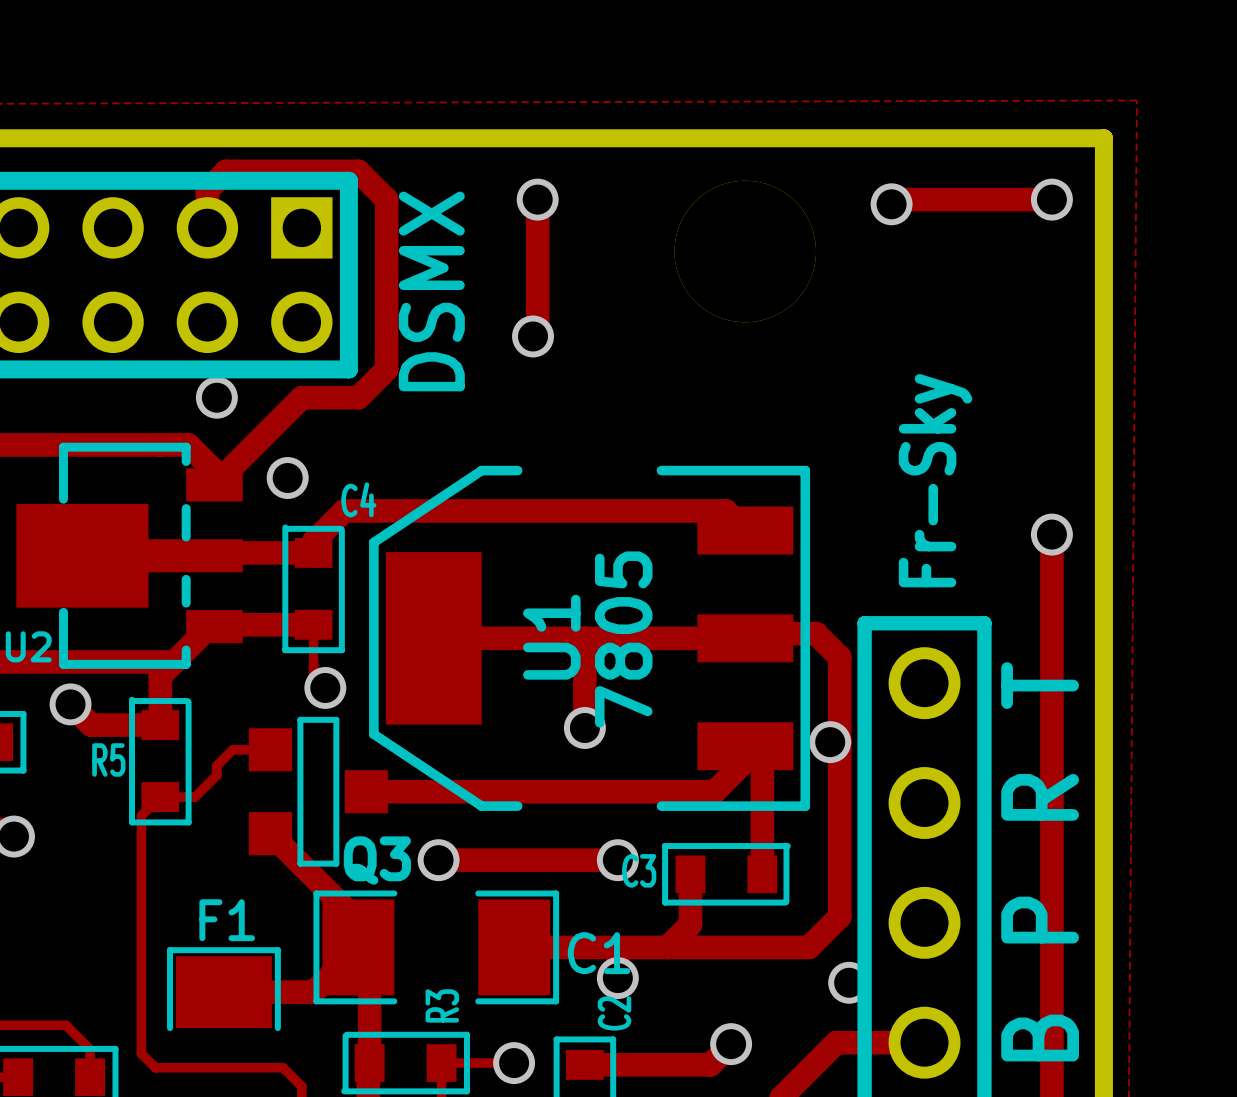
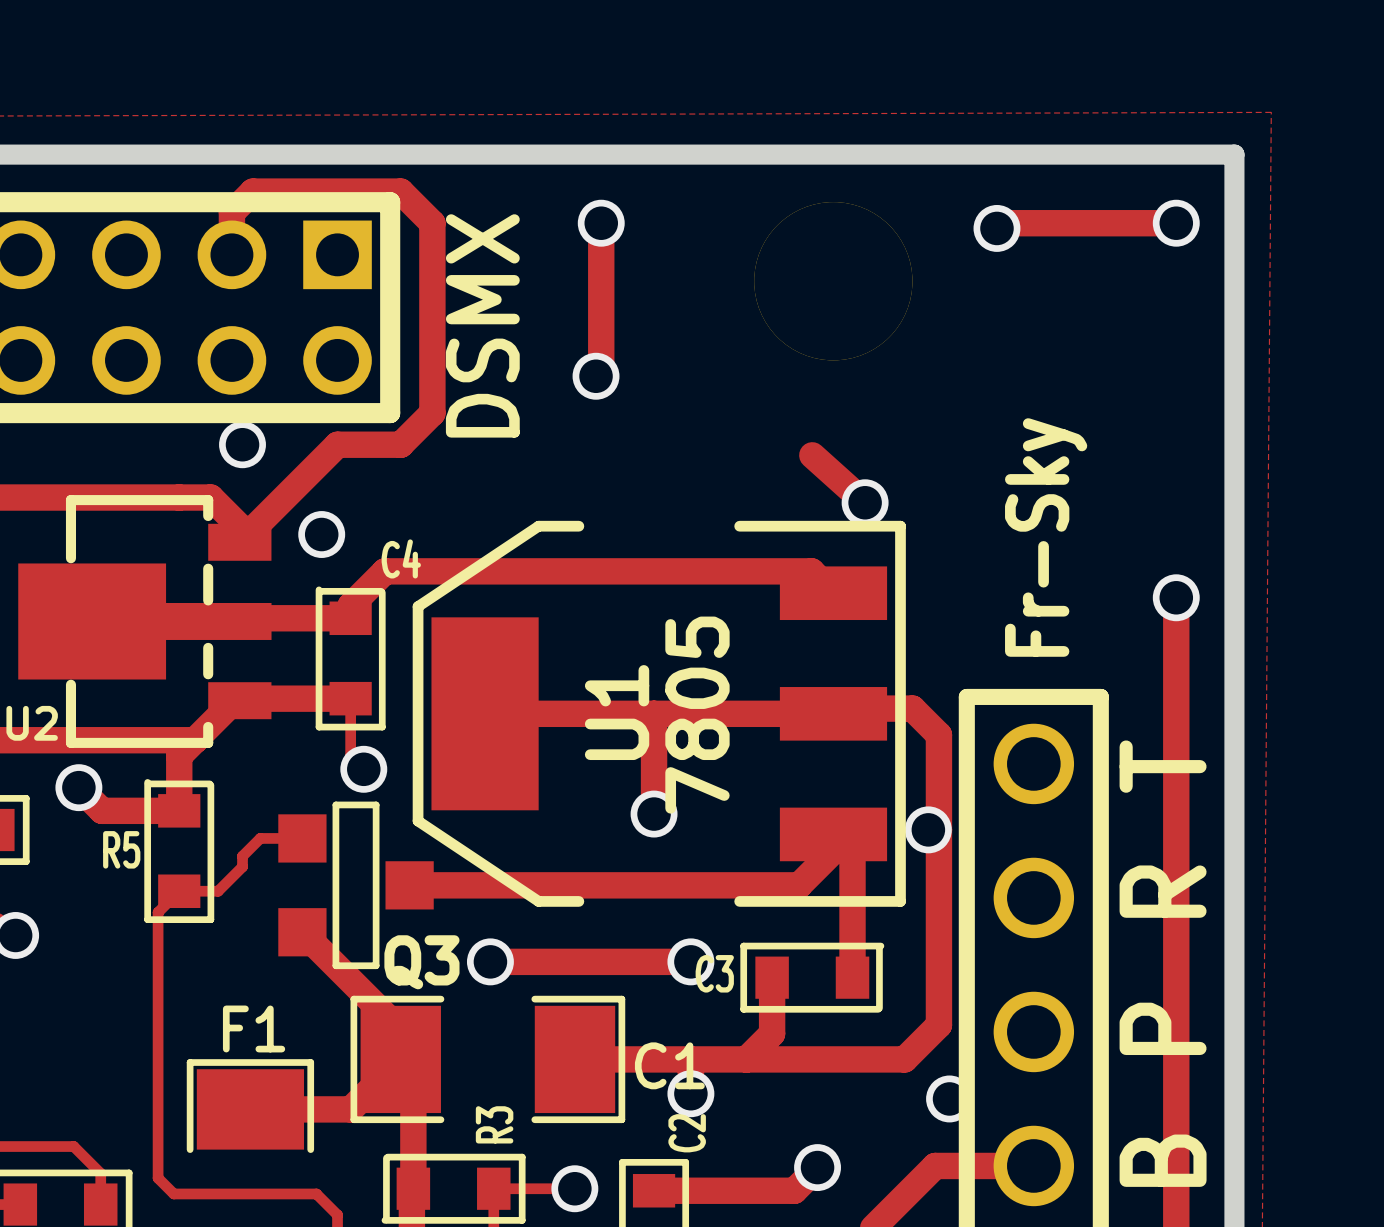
track: none -> (812, 455) (865, 502)
via: none -> (865, 502)

